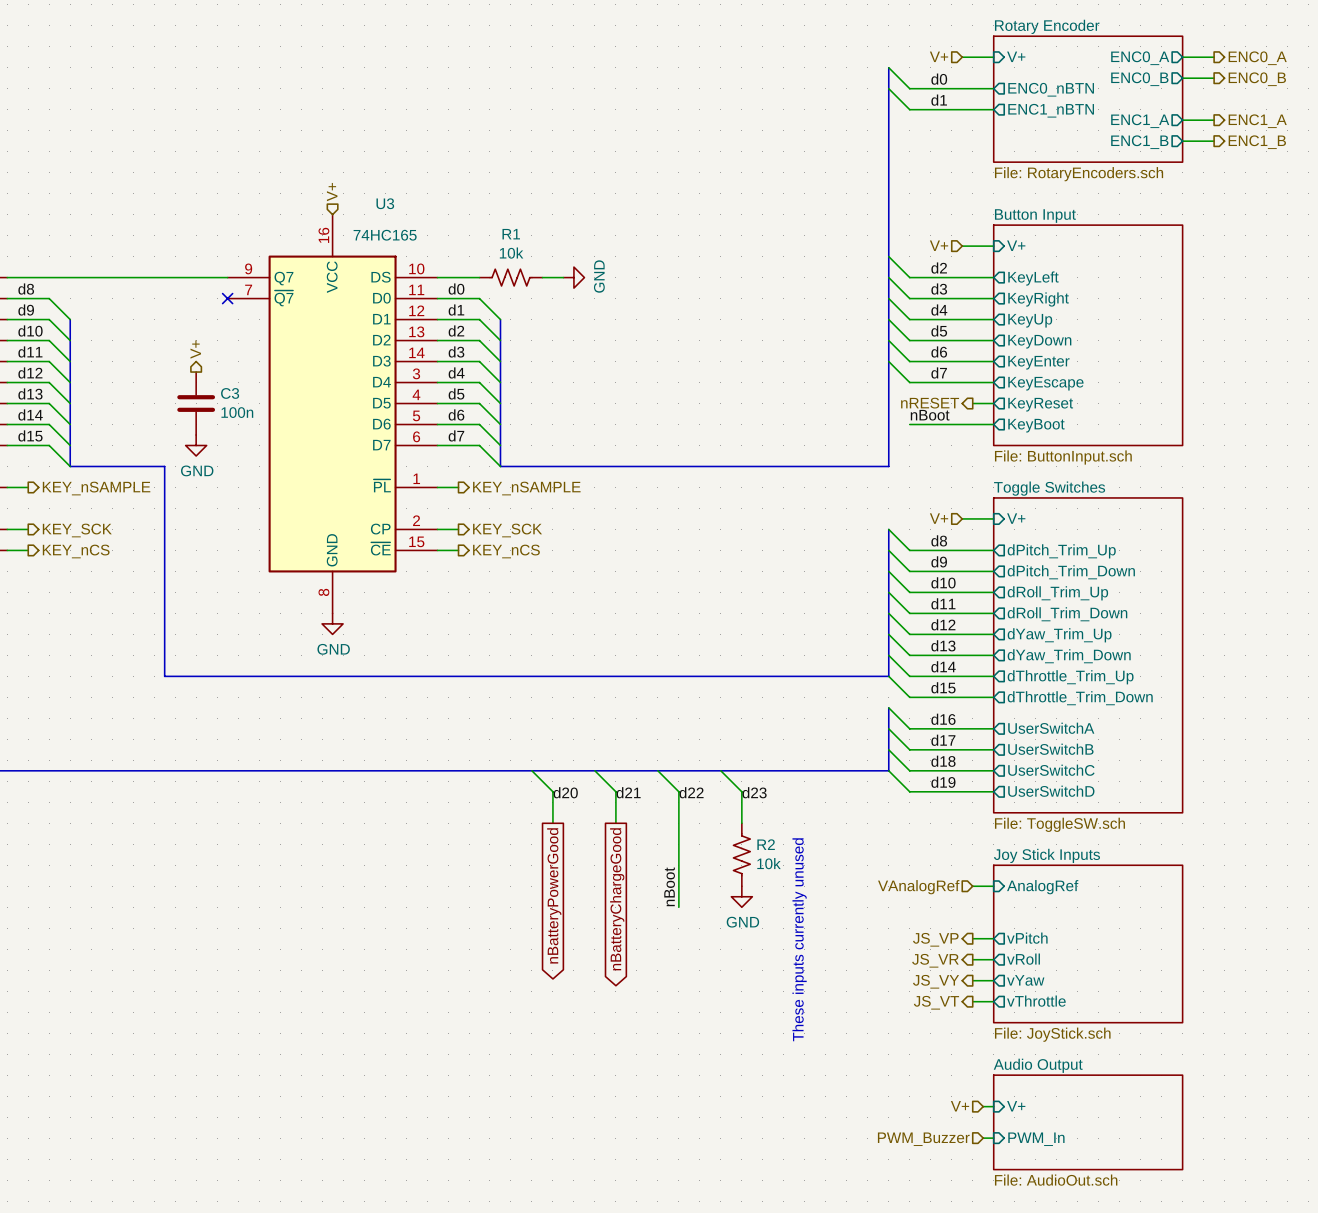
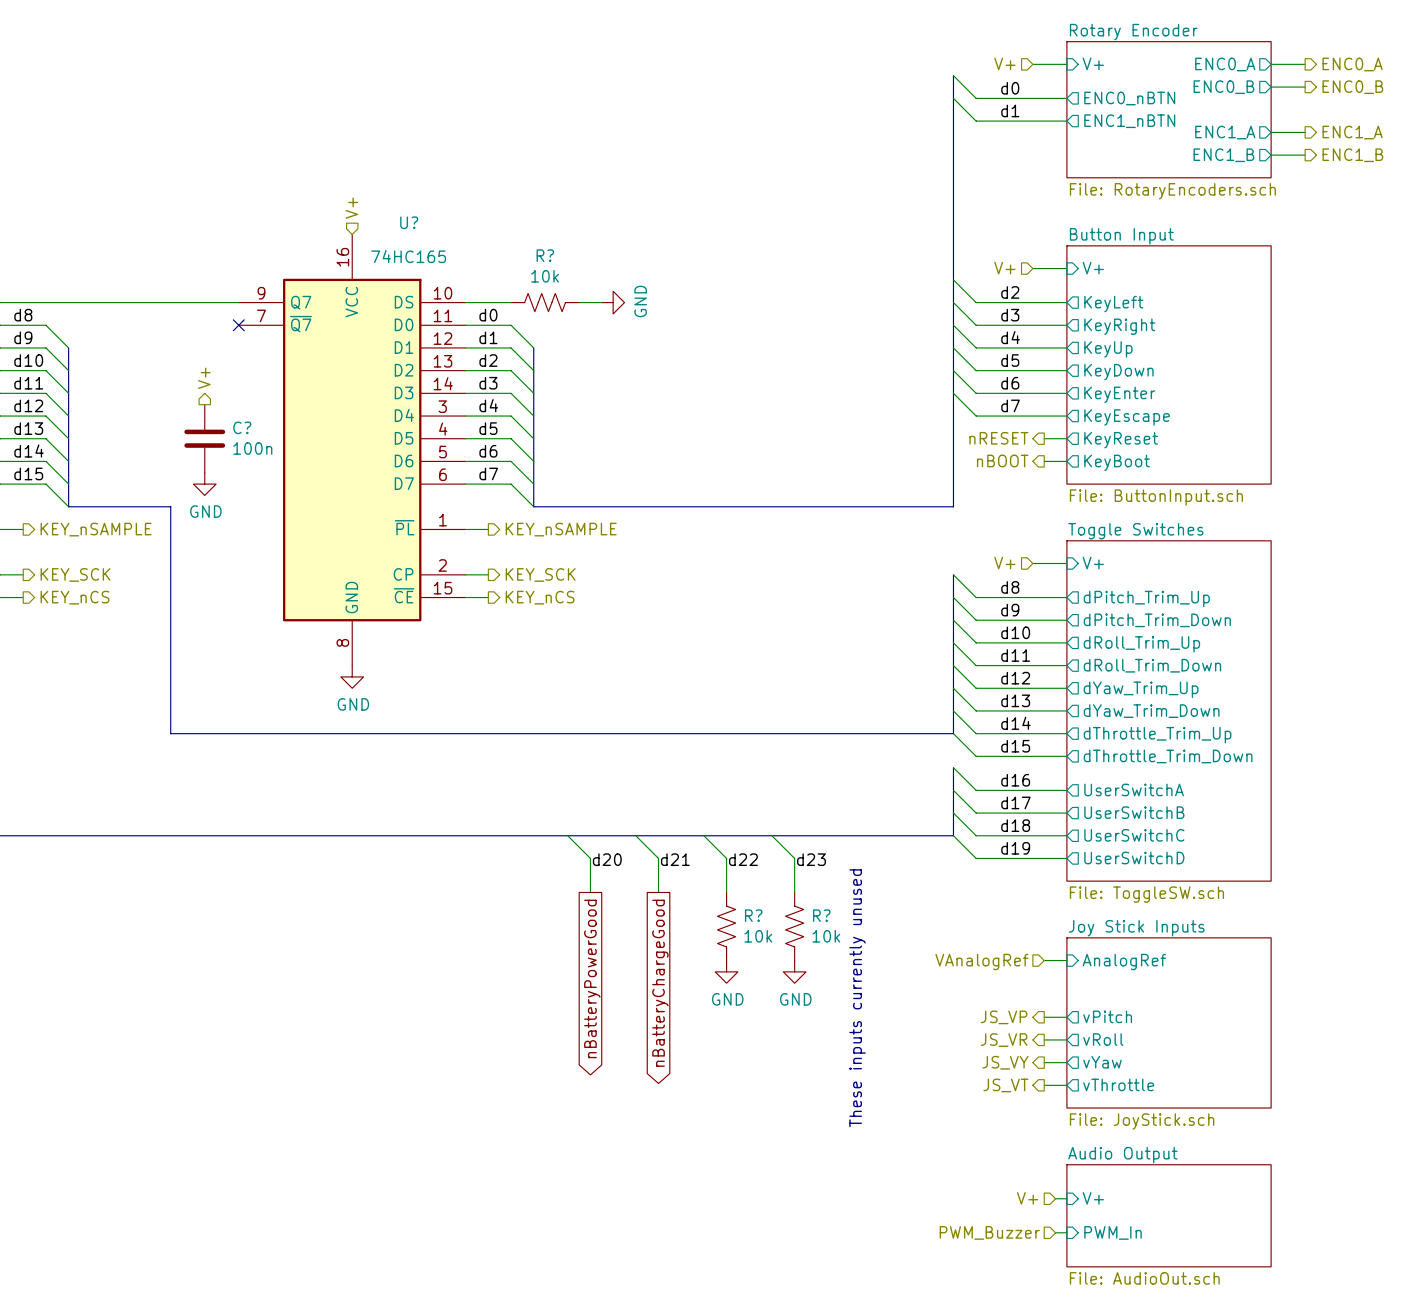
U3 name: U3 (385, 203) -> U? (409, 222)
R1 name: R1 (511, 234) -> R? (545, 255)
C3 name: C3 (230, 393) -> C? (242, 427)
label: nBoot (930, 415) -> none
wire: (909, 424) (972, 424) -> none
hierarchical label: none -> nBOOT (1002, 460)
R2 name: R2 (766, 844) -> R? (821, 915)
R?: none -> 10k (726, 926)
label: nBoot (669, 886) -> none
power symbol: none -> GND (726, 971)

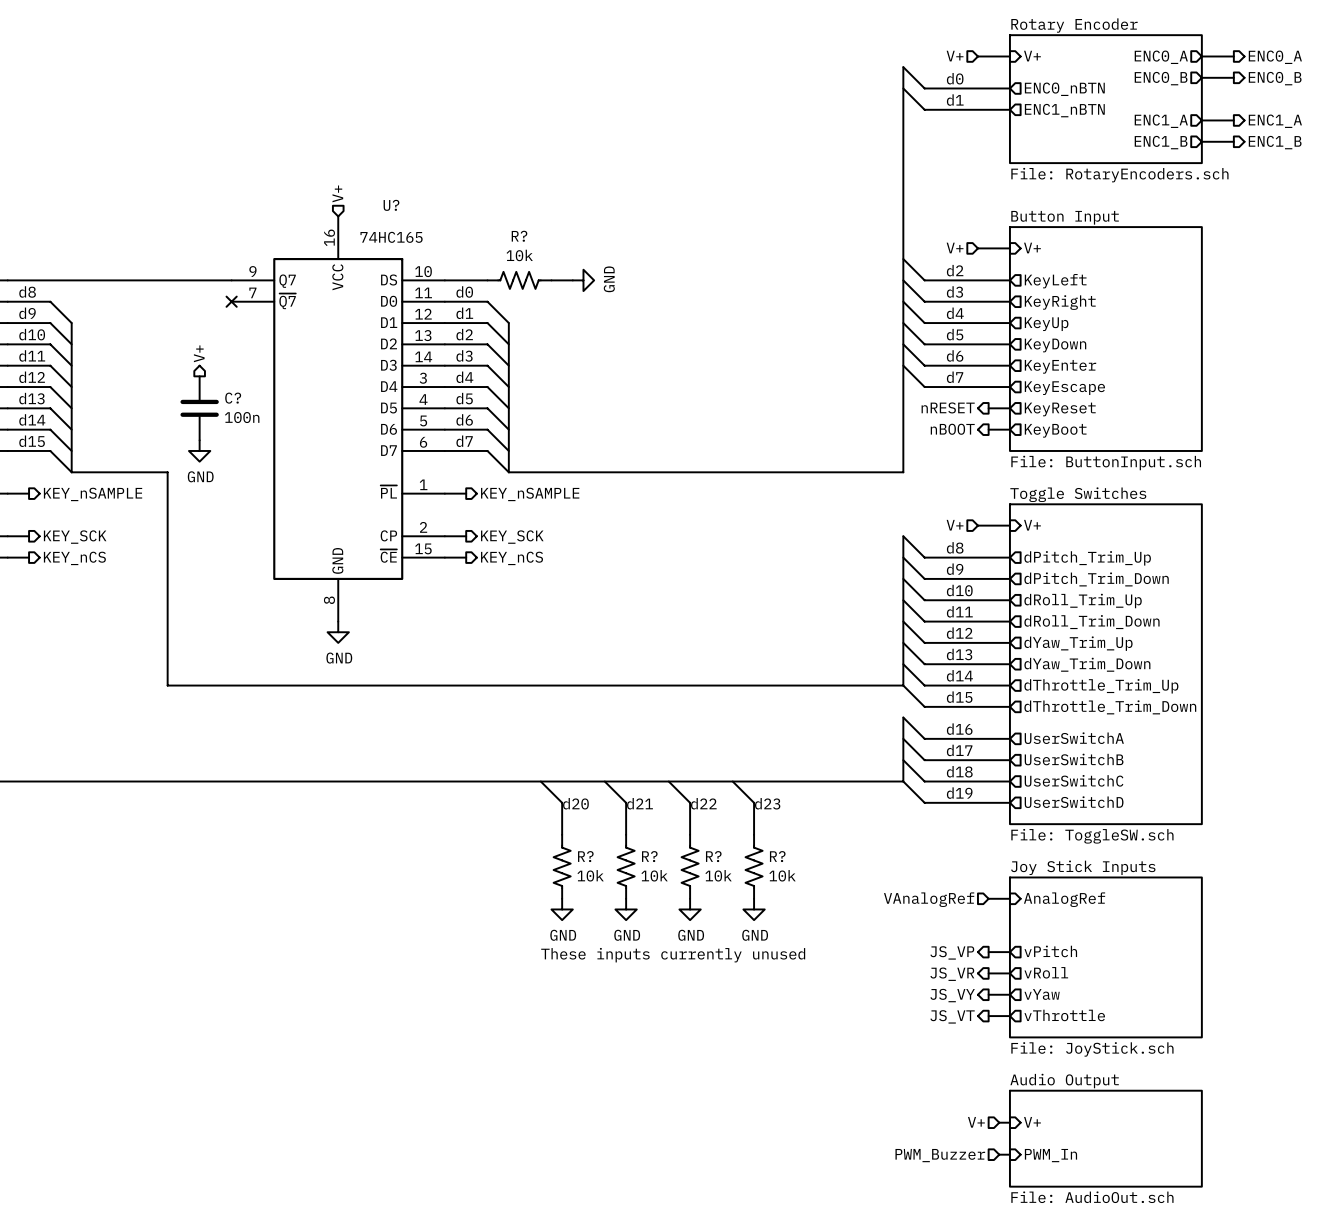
R?: none -> 10k (562, 866)
R?: none -> 10k (626, 866)
power symbol: none -> GND (562, 909)
power symbol: none -> GND (626, 909)
global label: nBatteryPowerGood (592, 978) -> none
global label: nBatteryChargeGood (660, 983) -> none
text: These inputs currently unused (857, 998) -> none
text: none -> These inputs currently unused (673, 955)

